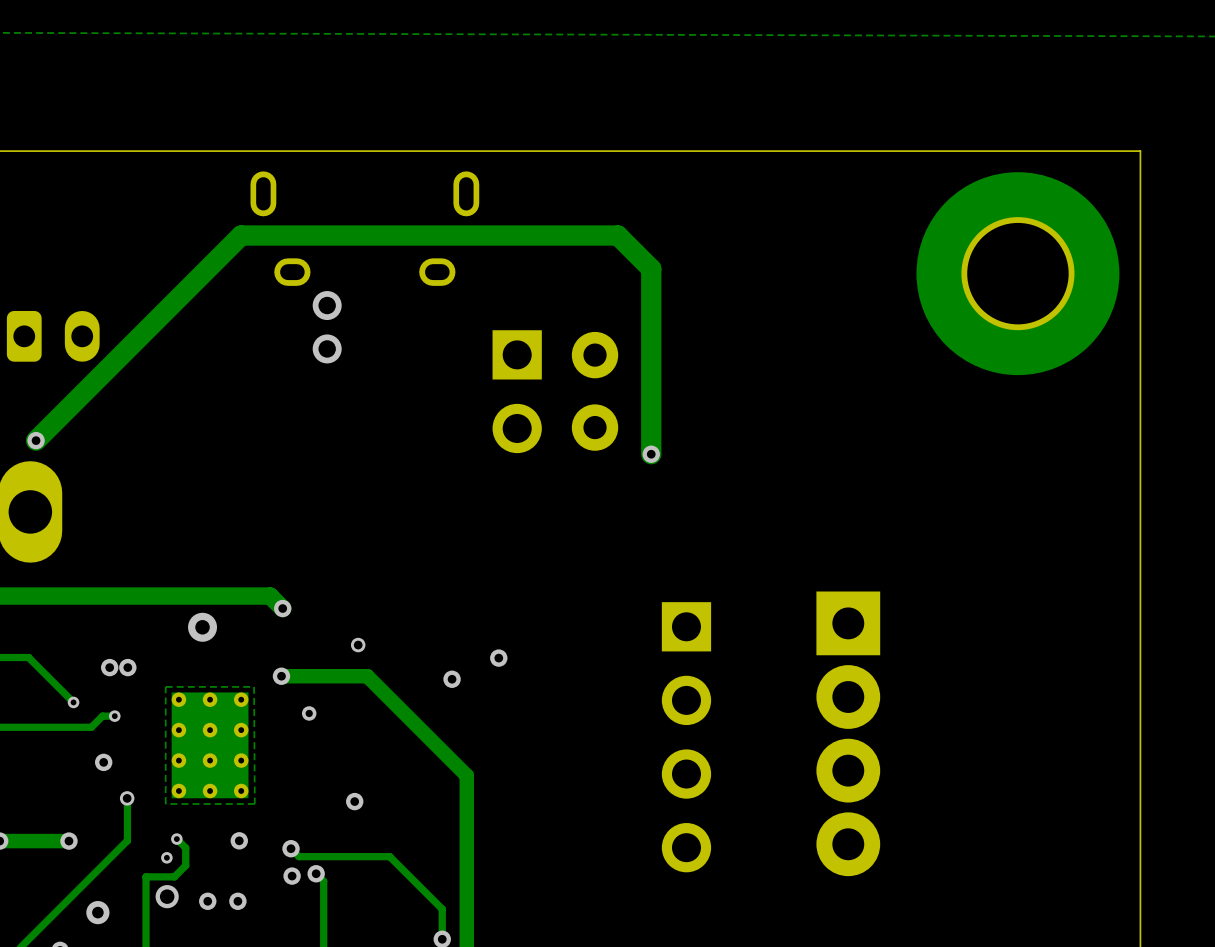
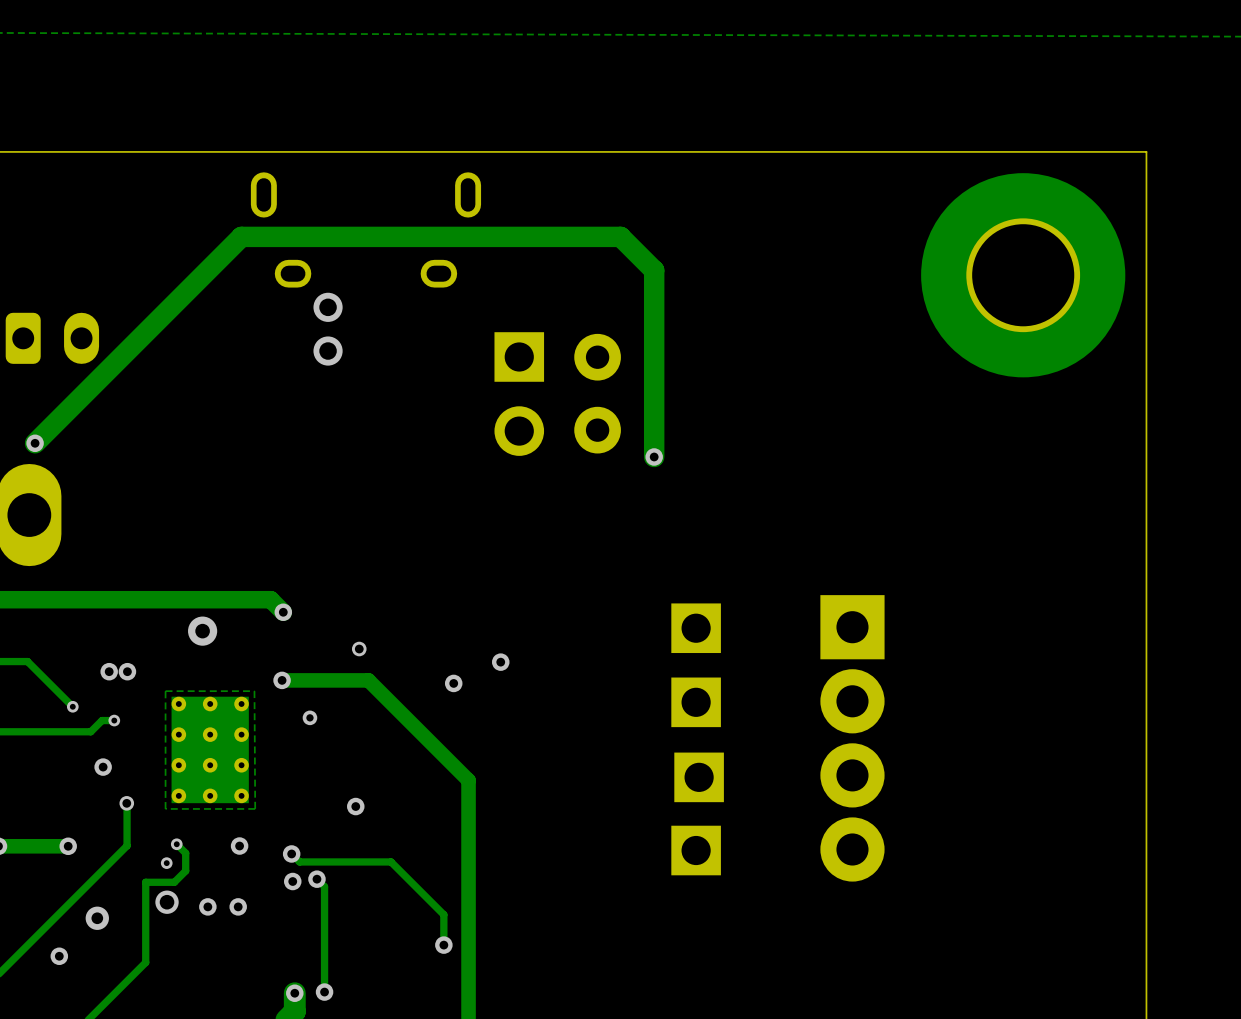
part: none -> (696, 628)
part: none -> (696, 702)
part: (686, 737) -> none
part: none -> (699, 777)
part: none -> (696, 850)

